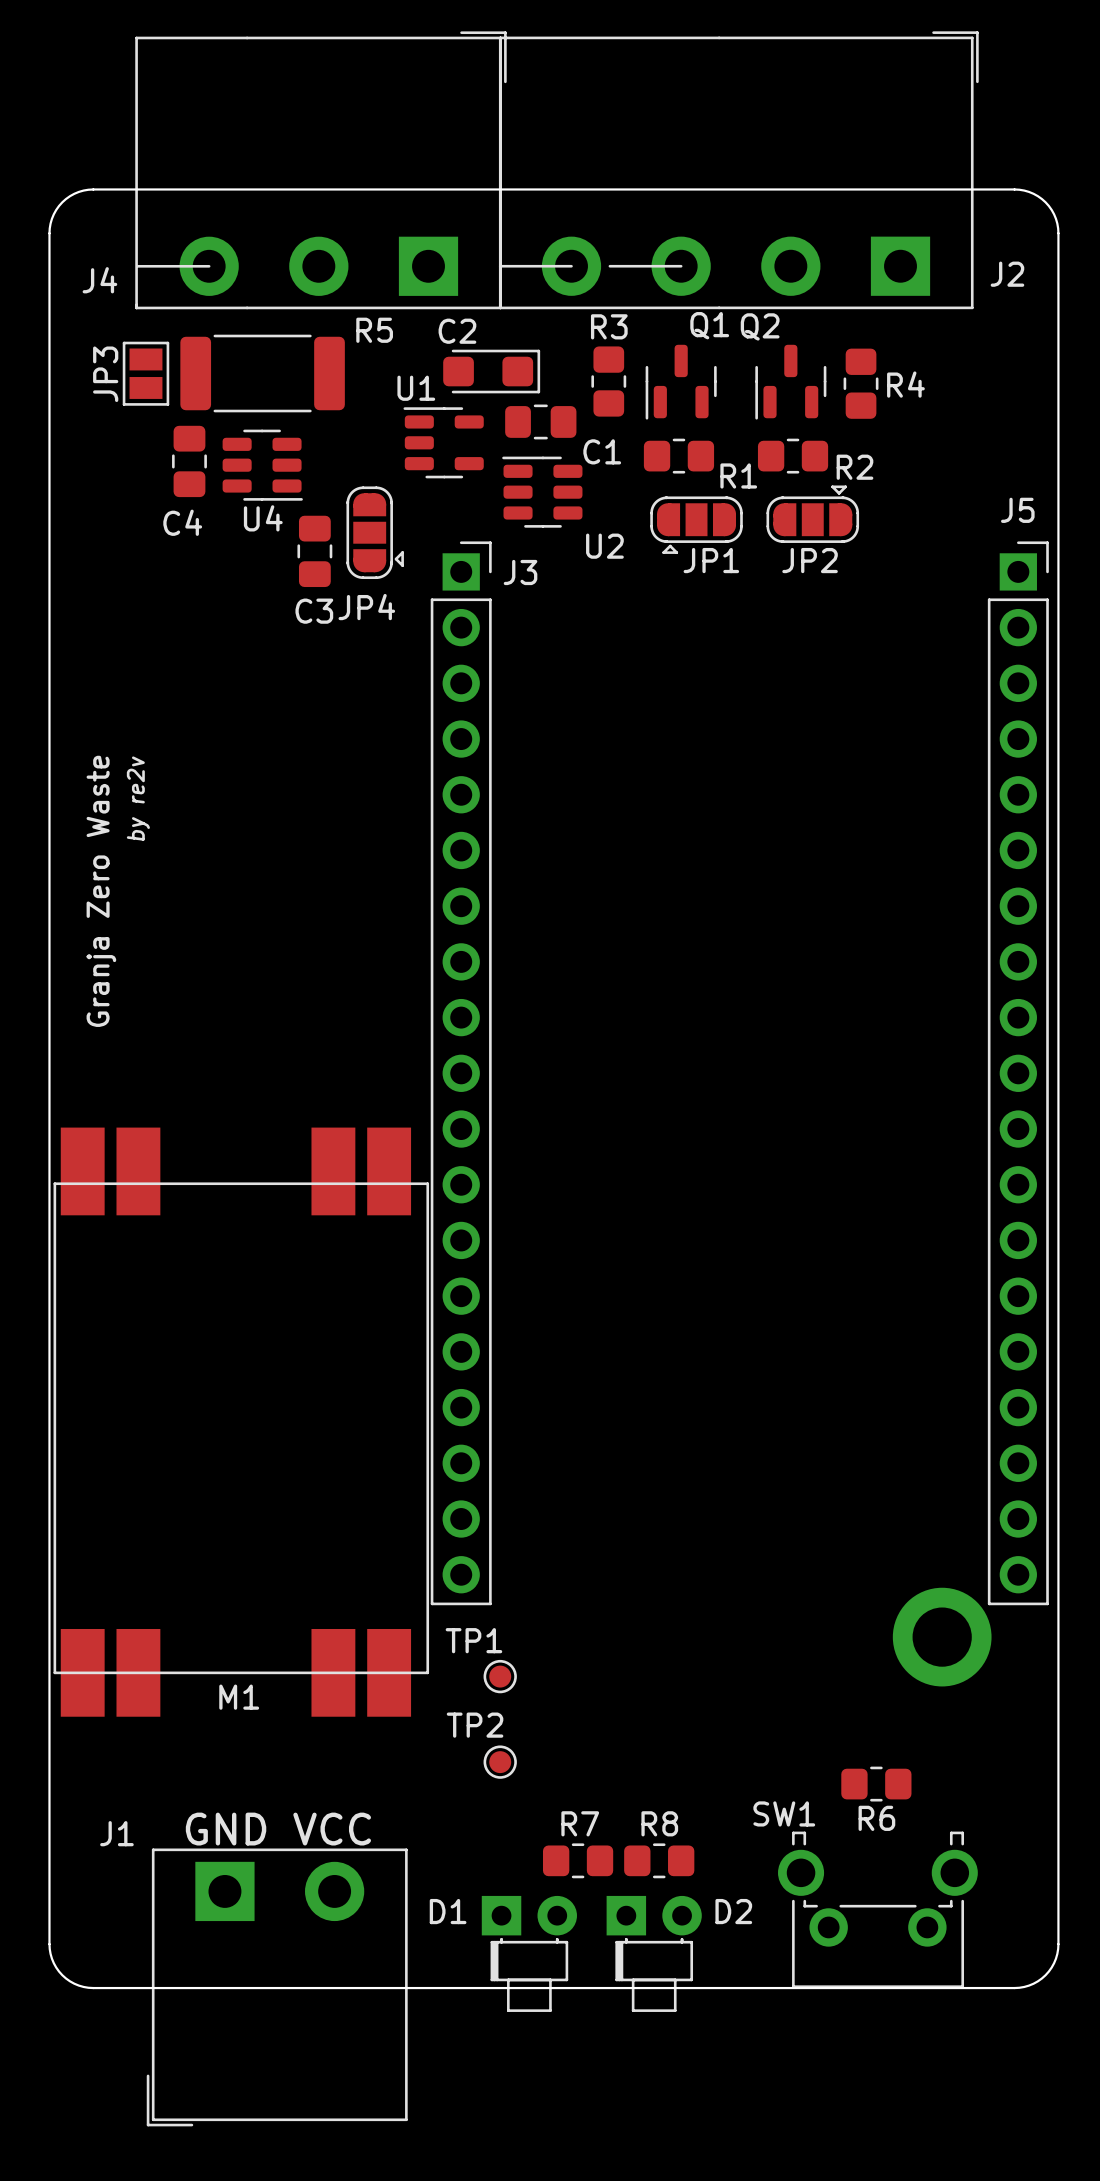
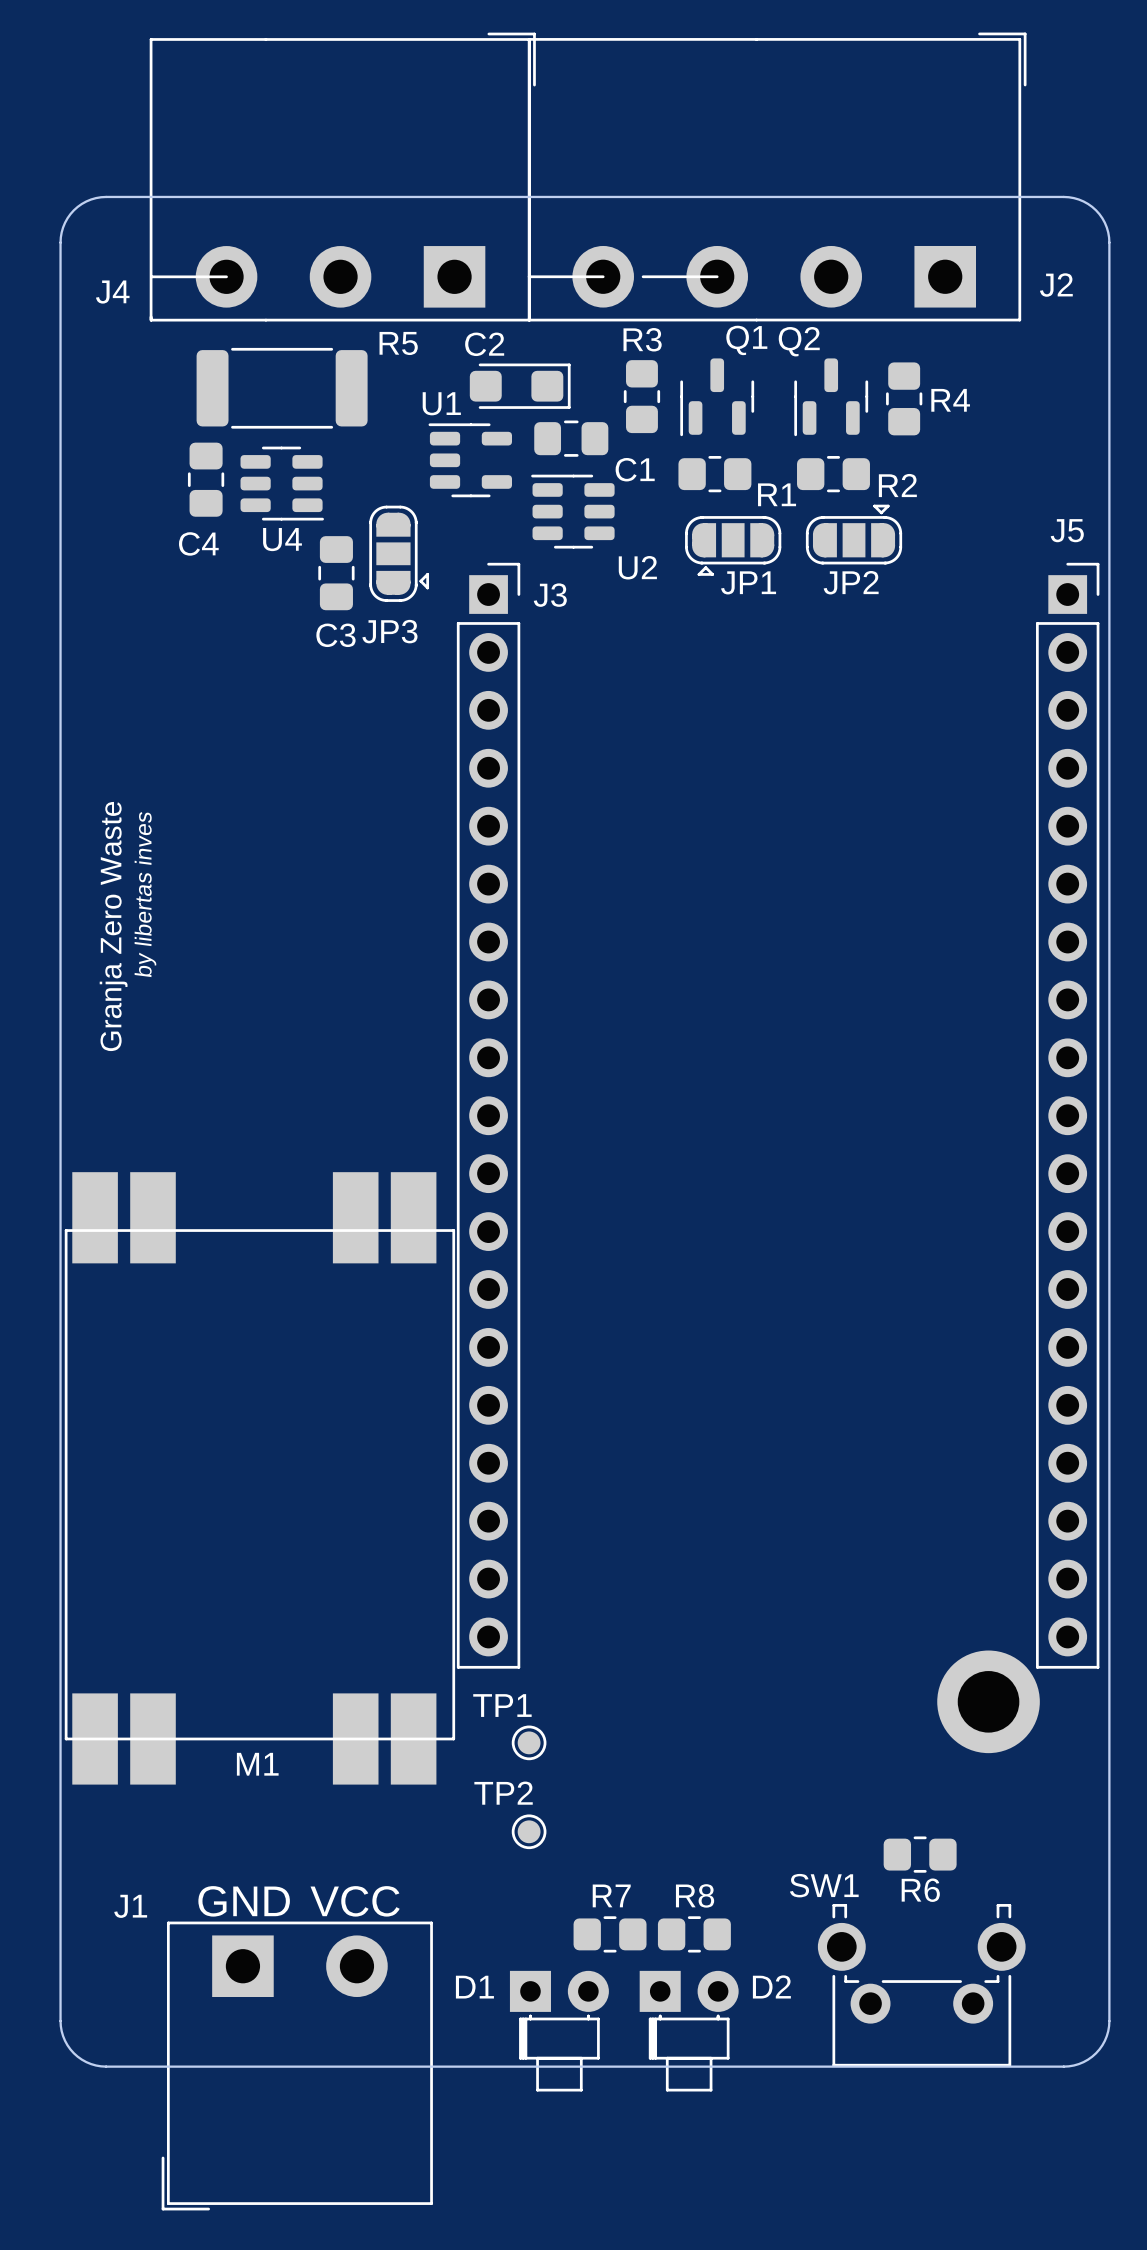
JP3: (145, 373) -> none
JP4 name: JP4 (366, 607) -> JP3 (389, 631)
text: by re2v (138, 798) -> none
text: none -> by libertas inves (145, 894)

